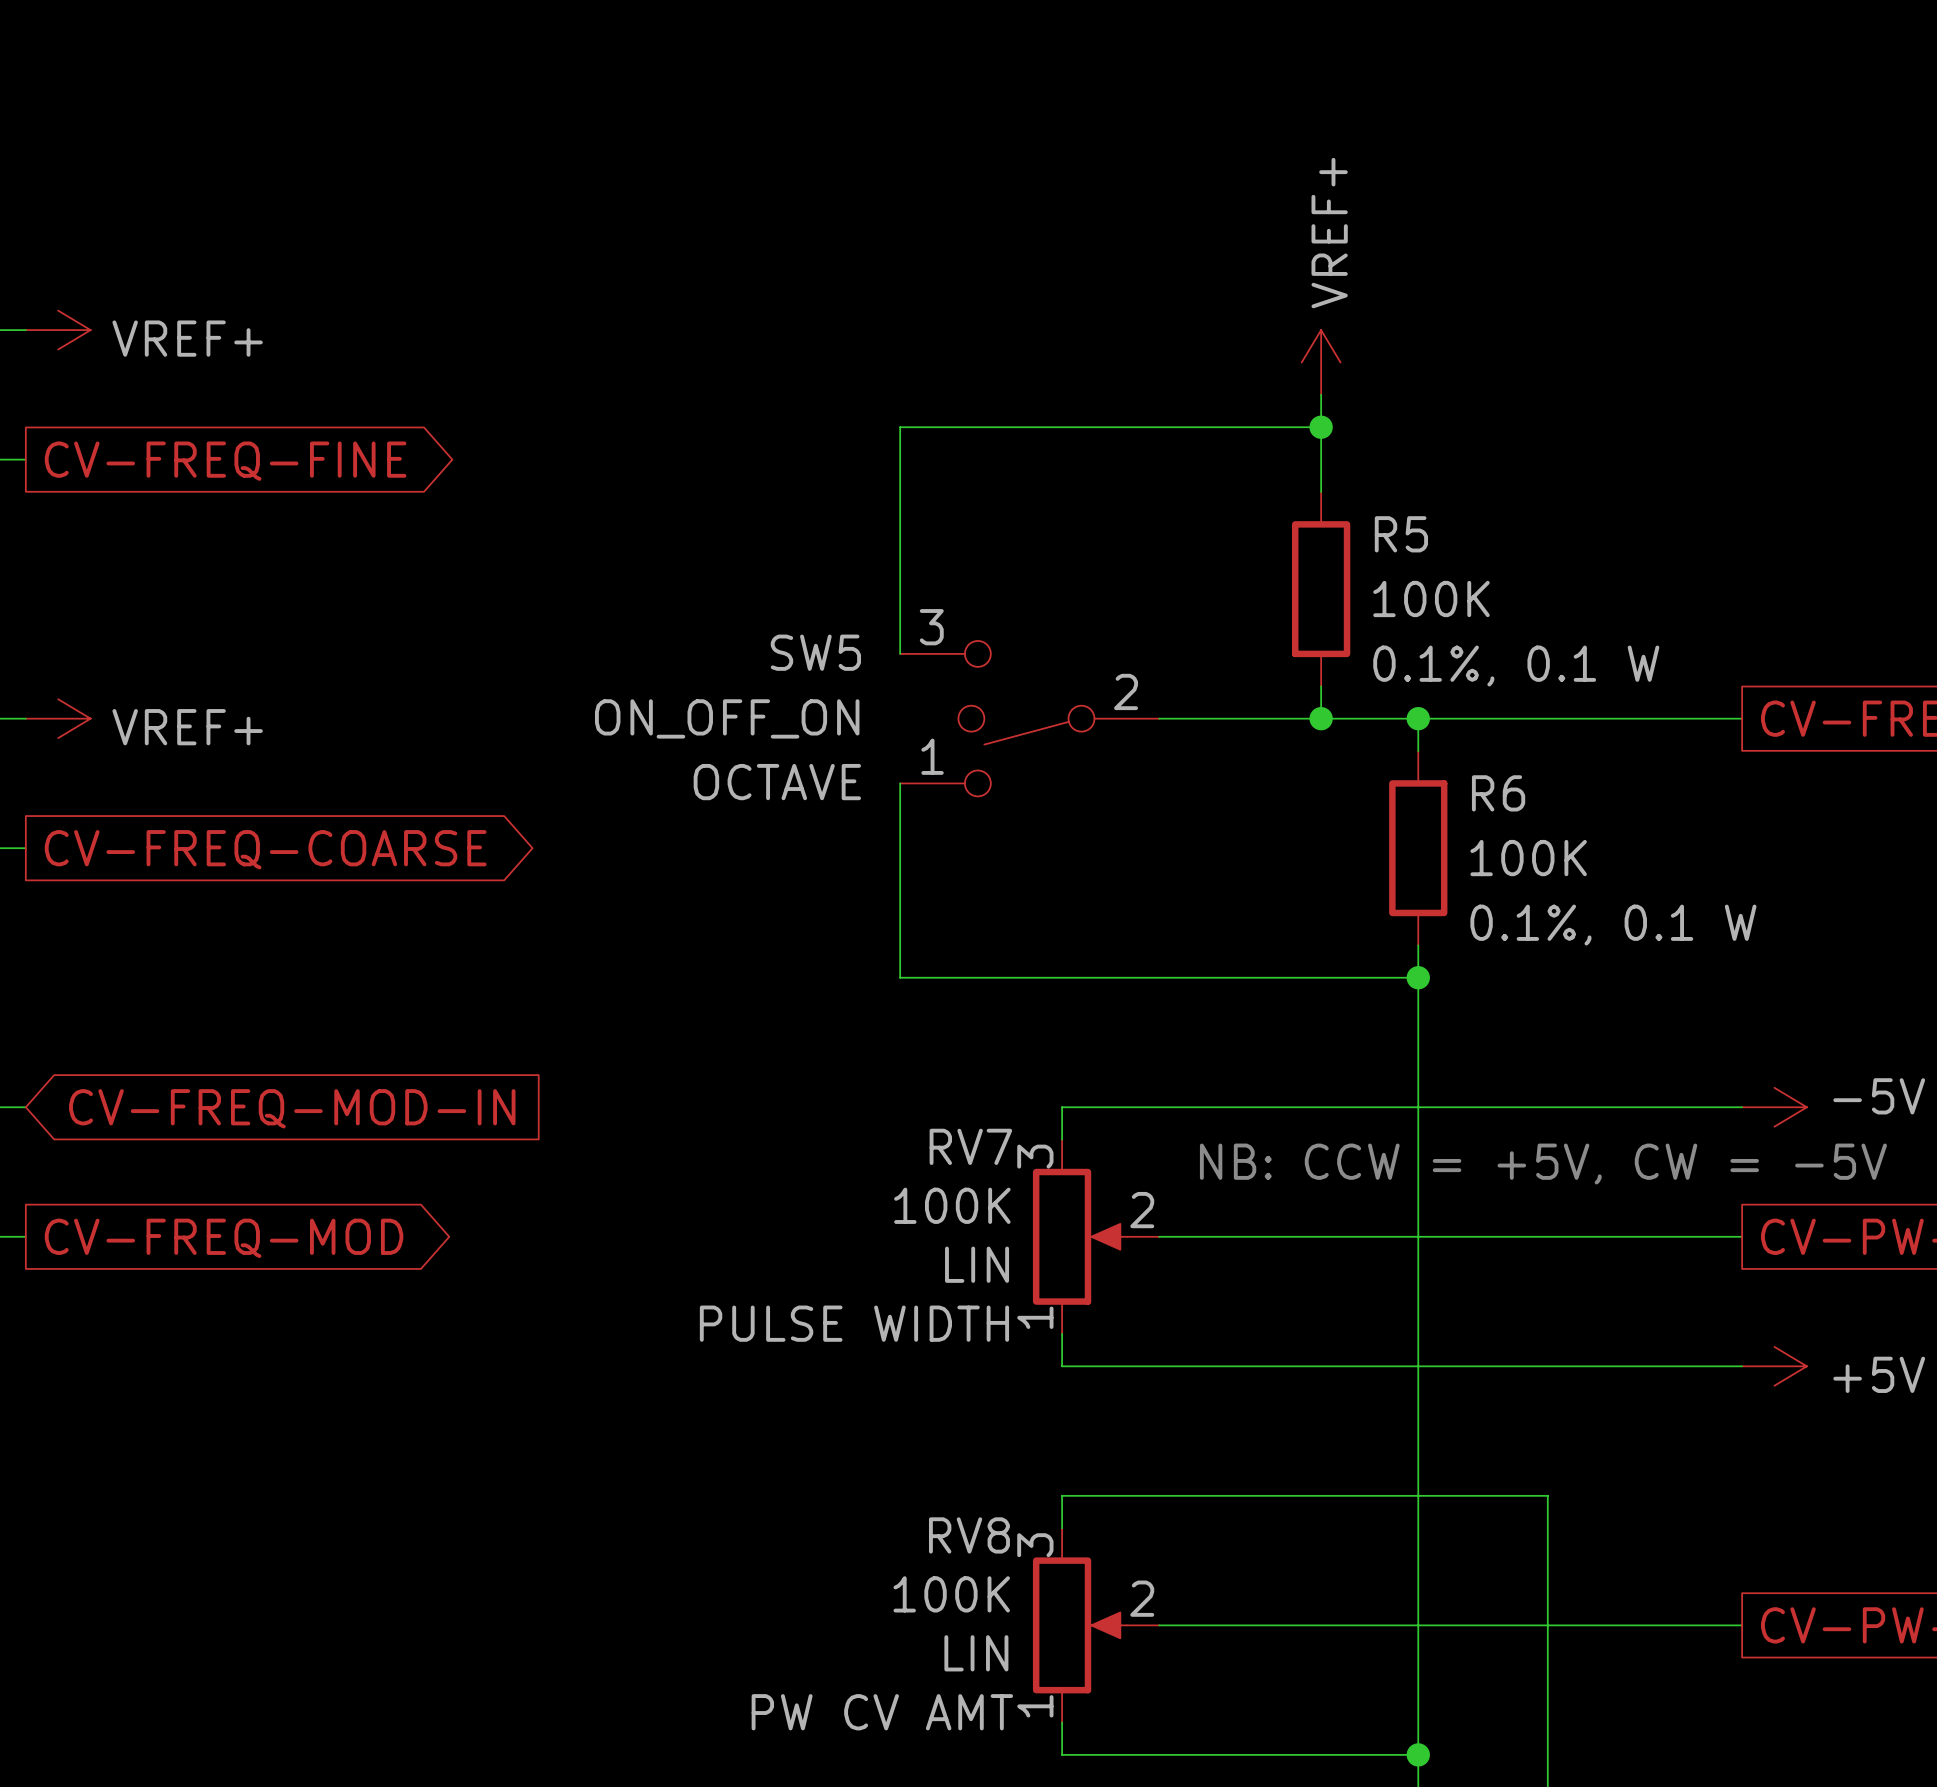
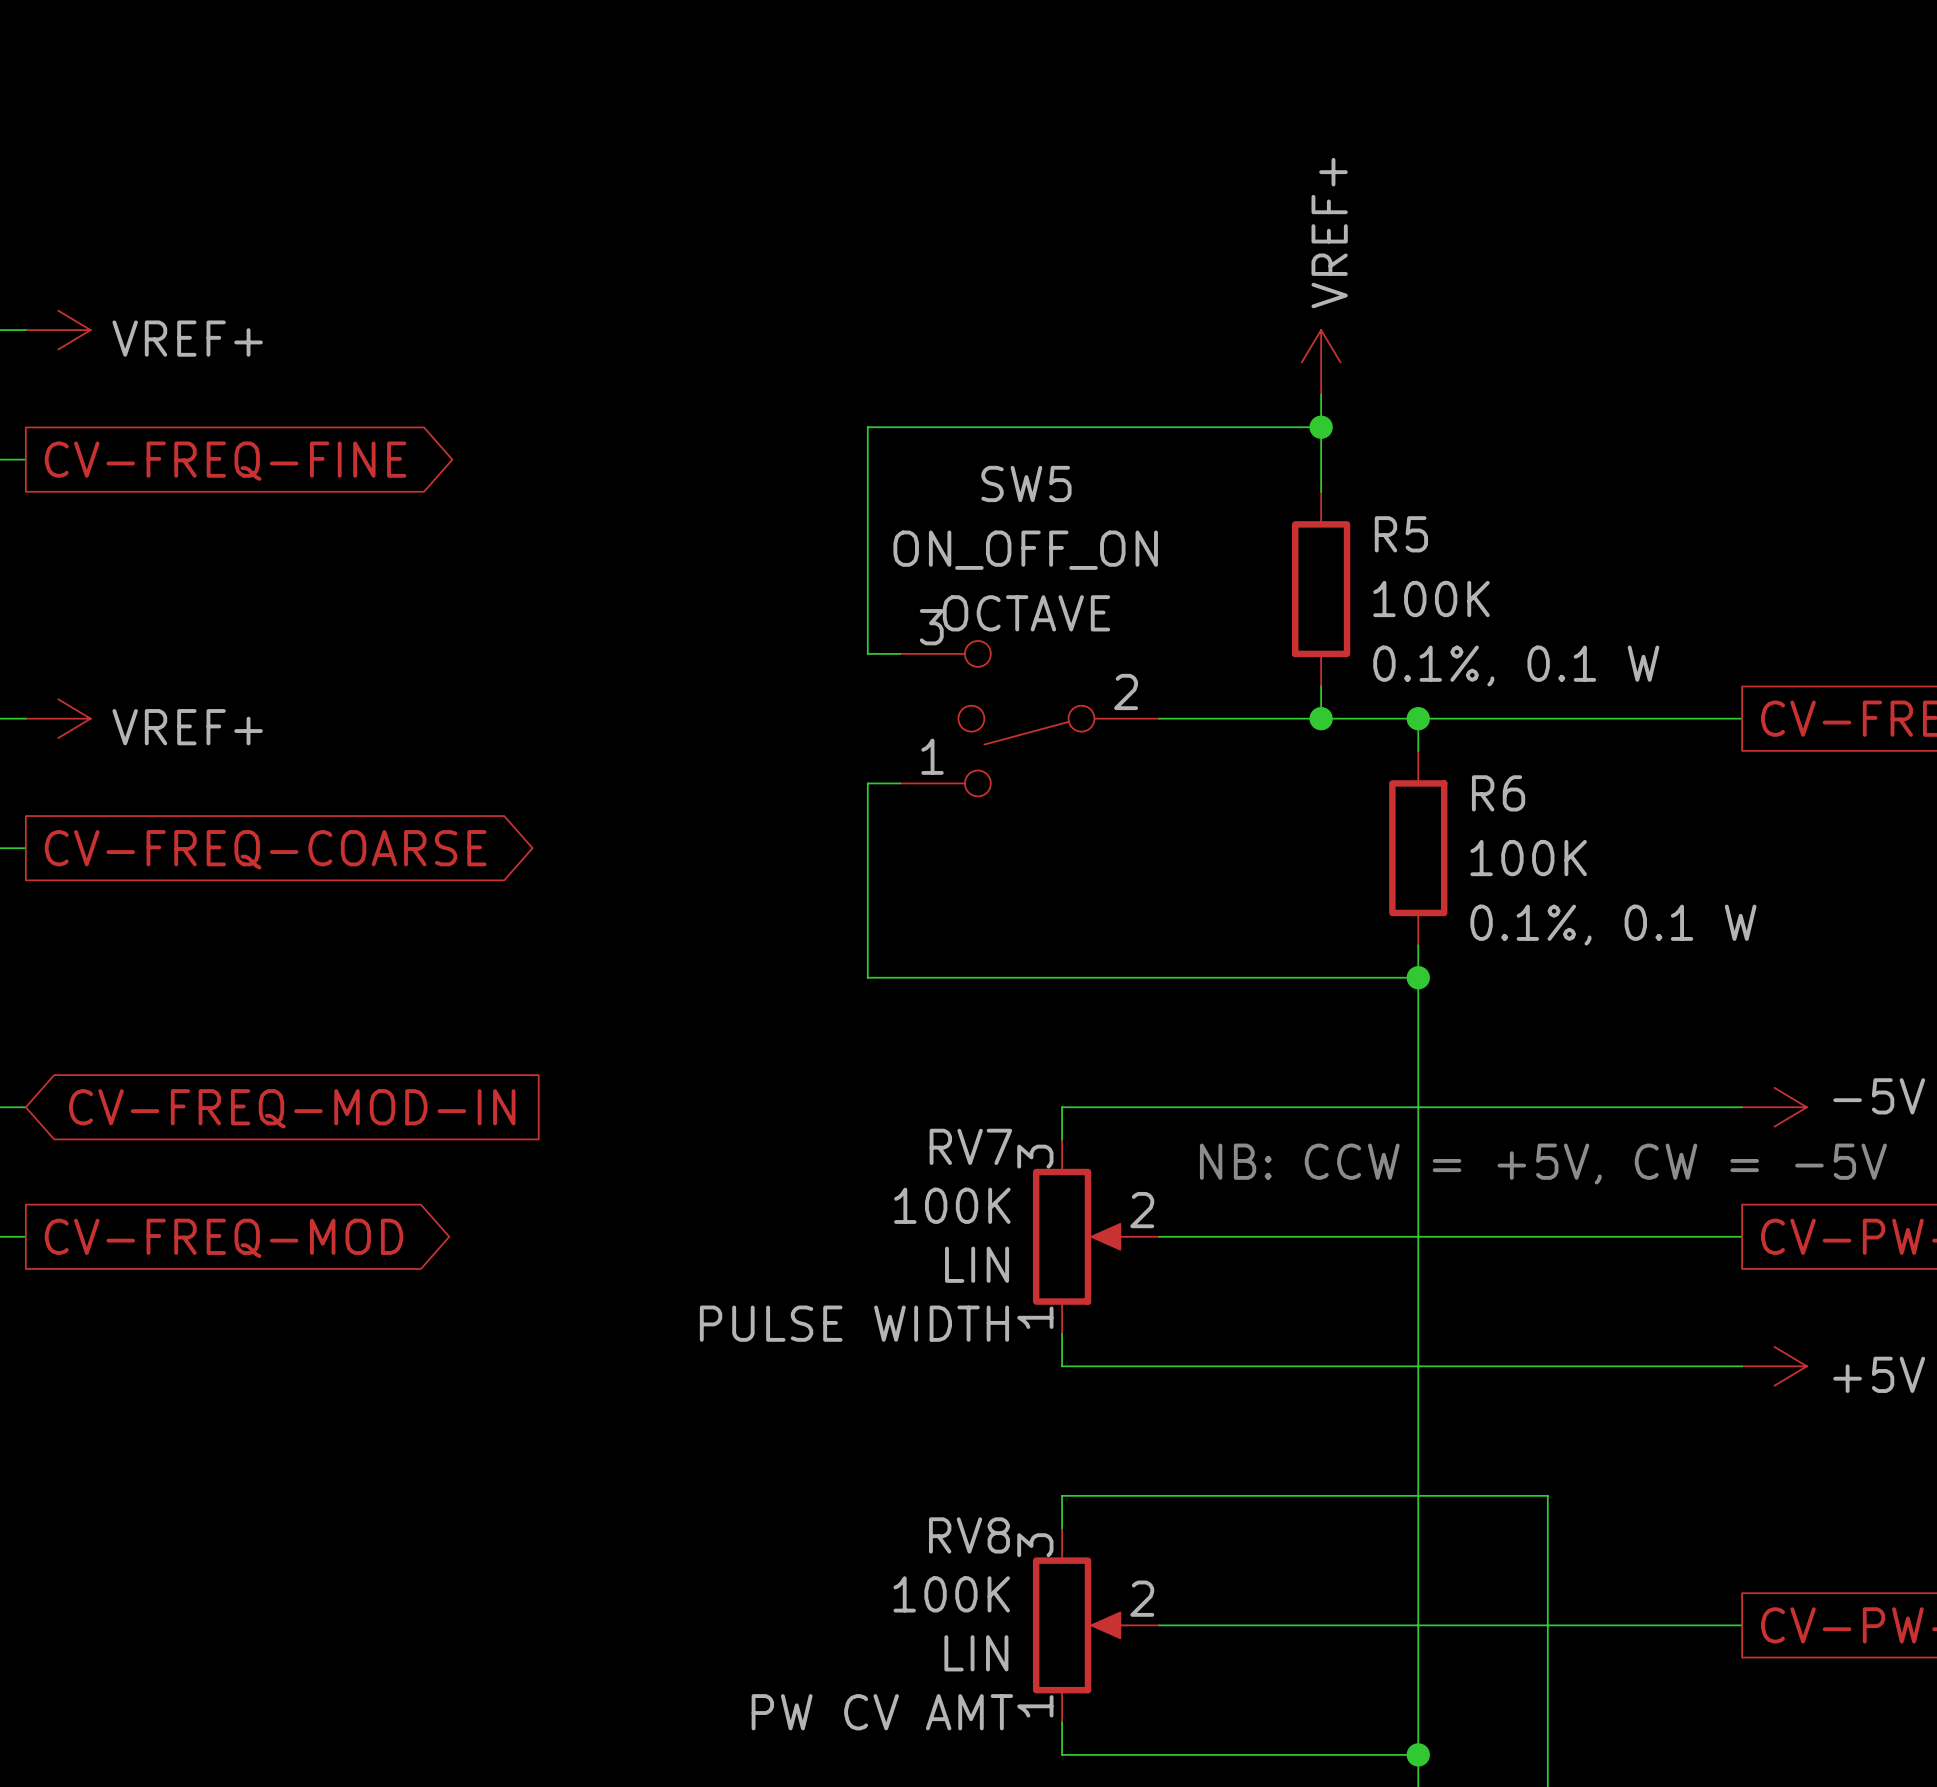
wire: (900, 427) (900, 653) -> (900, 427) (867, 427) (867, 653) (900, 653)
SW5 name position: SW5 (815, 652) -> SW5 (1026, 483)
SW5 value position: ON_OFF_ON (727, 718) -> ON_OFF_ON (1025, 550)
SW5 text position: OCTAVE (777, 782) -> OCTAVE (1026, 613)
wire: (900, 783) (900, 977) -> (900, 783) (867, 783) (867, 977) (900, 977)

